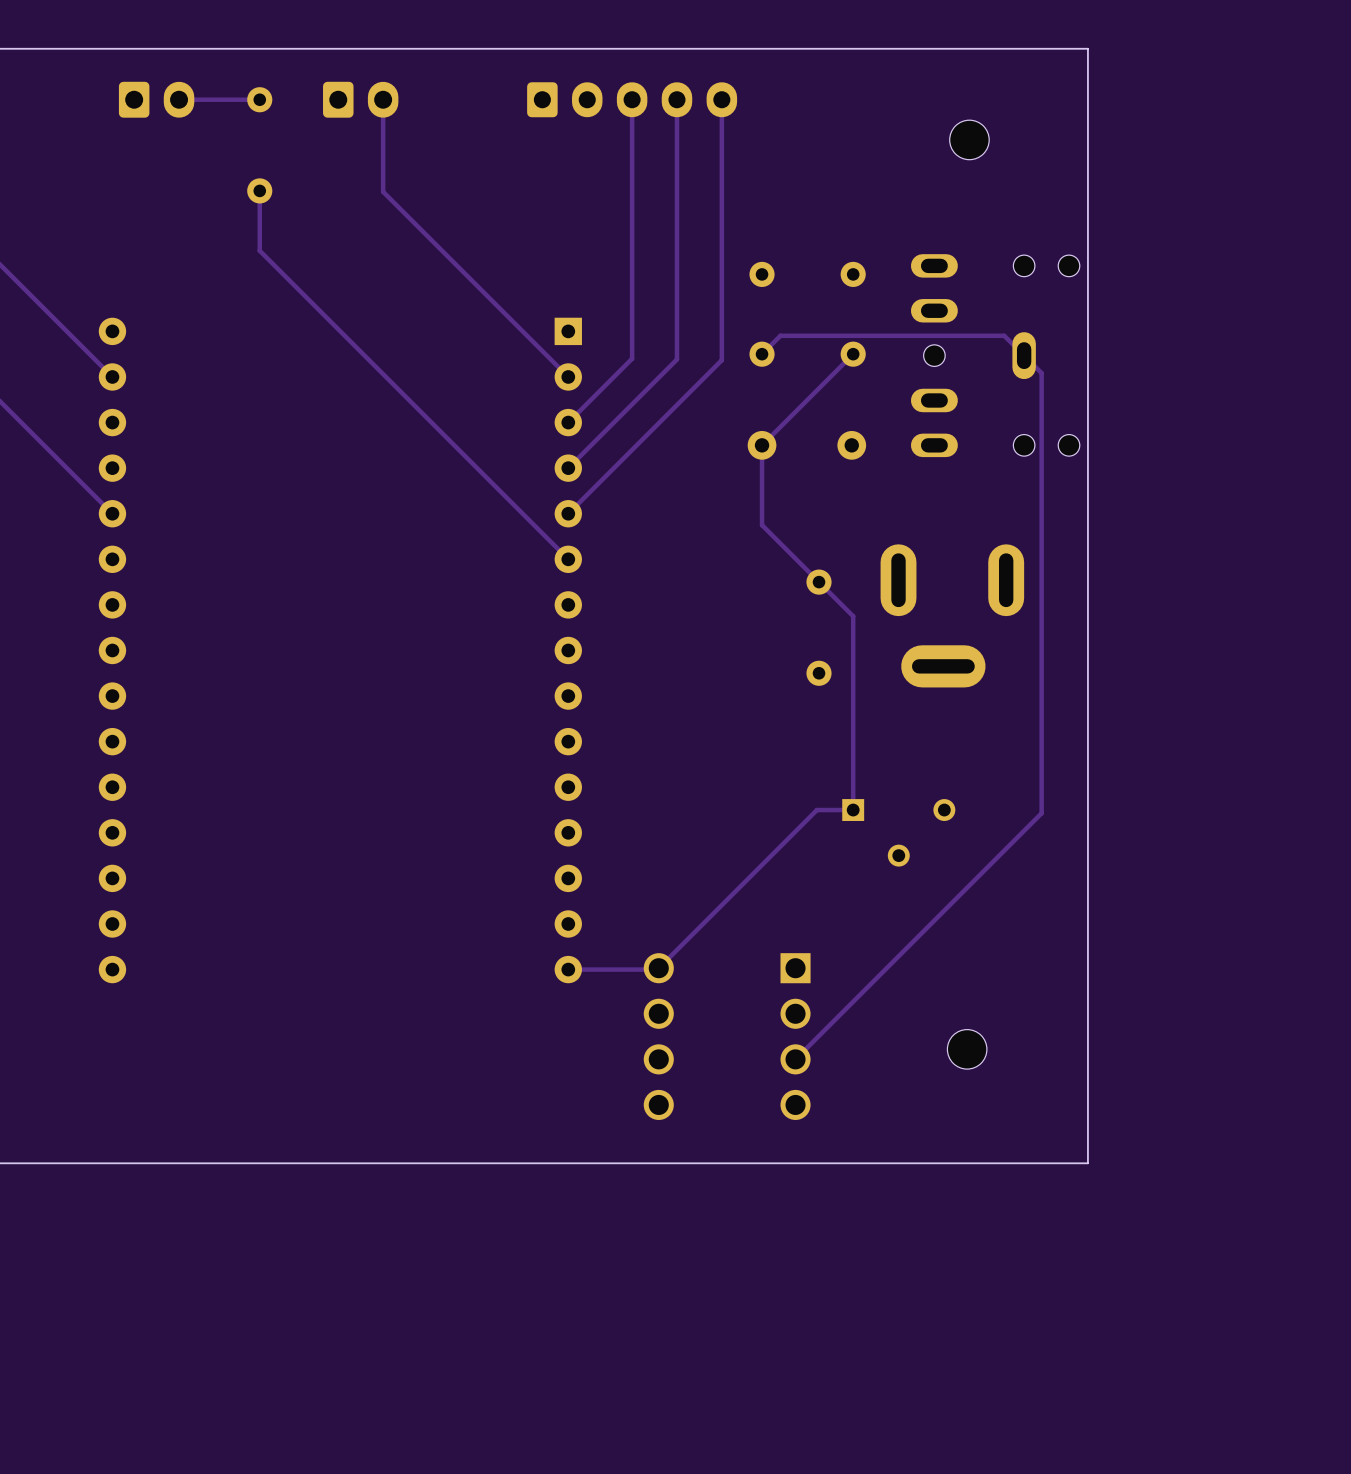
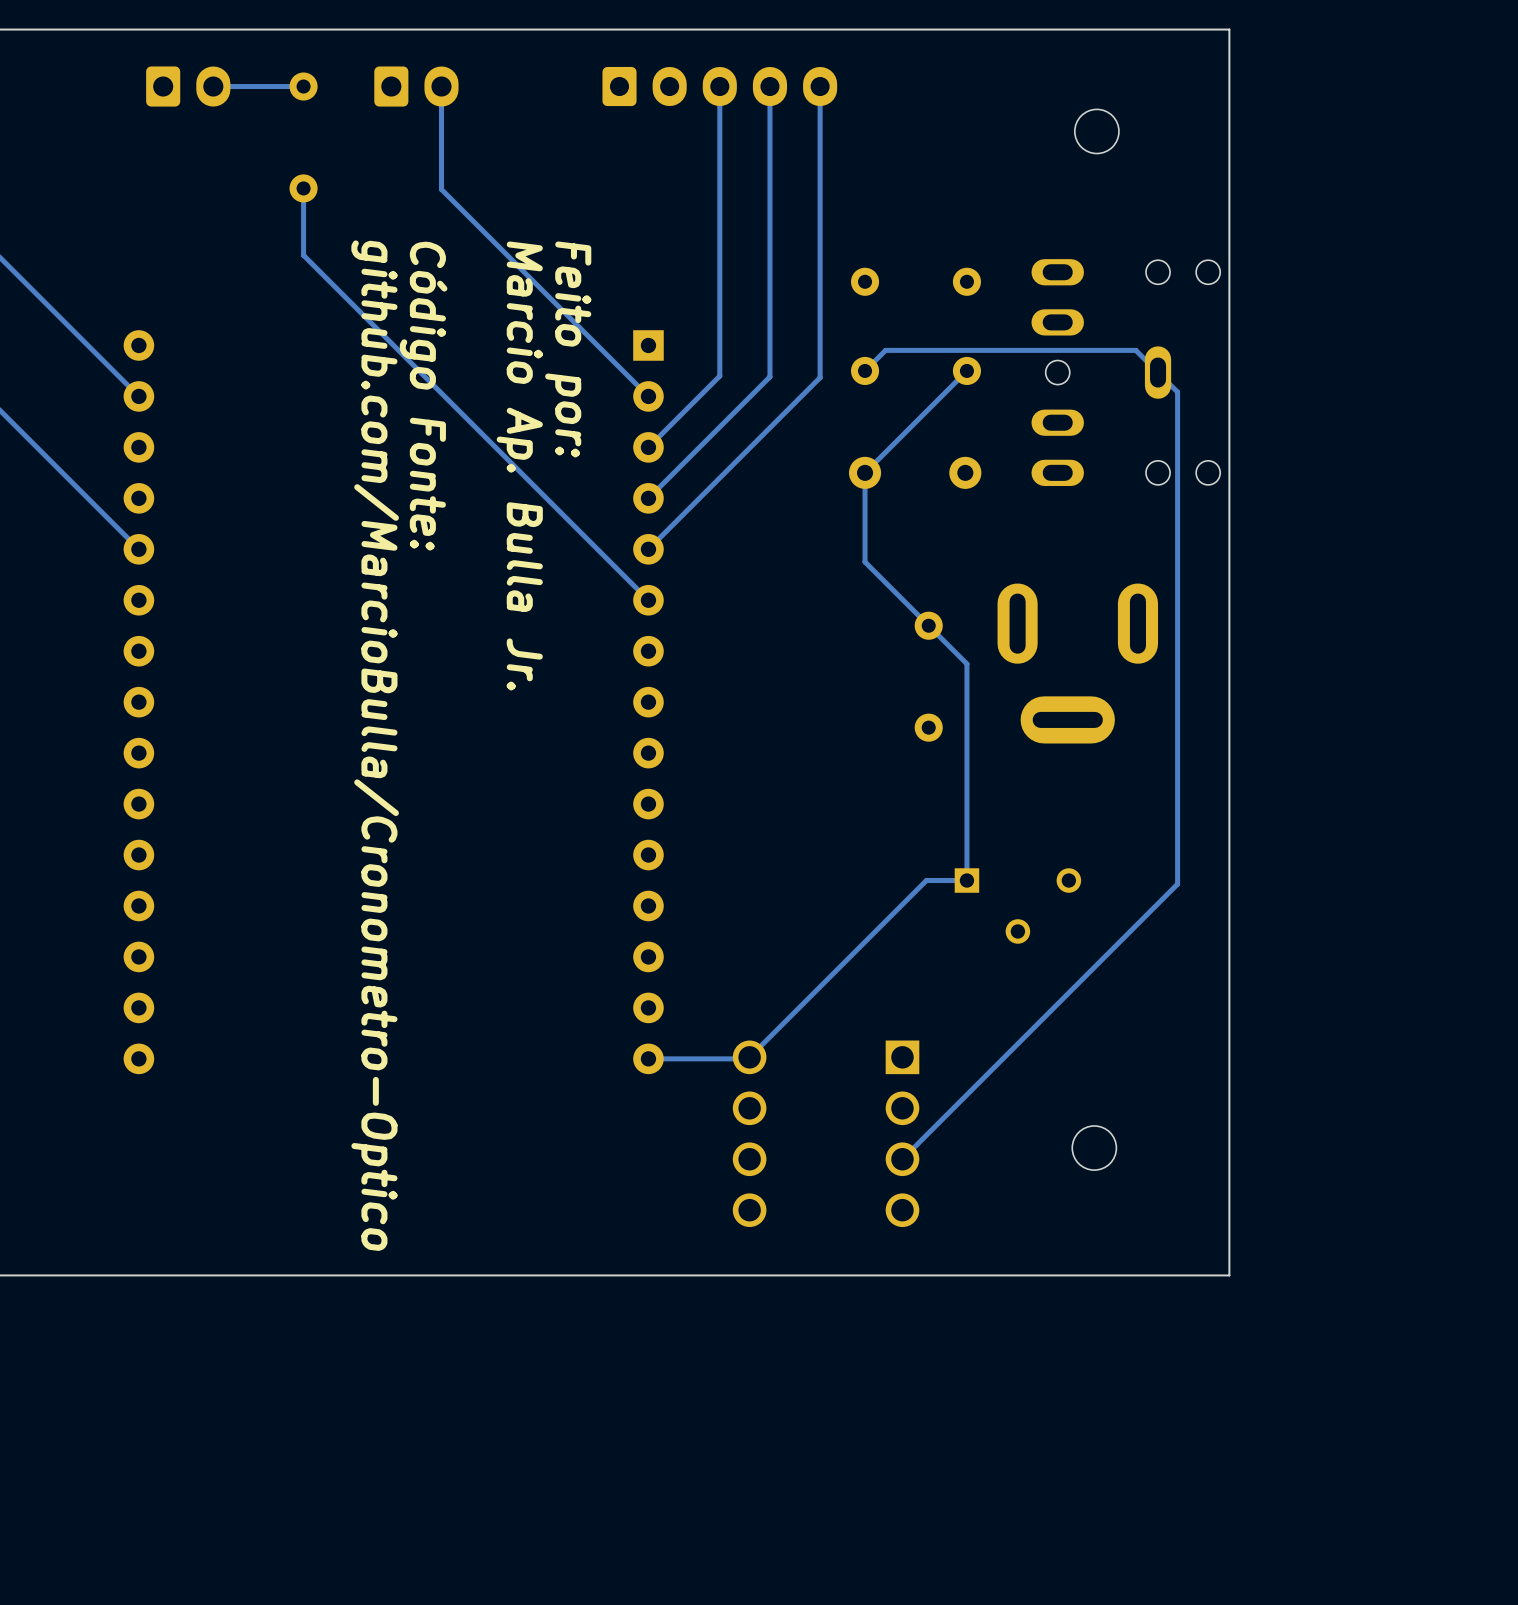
text: none -> Feito por: (568, 349)
text: none -> Código Fonte: (423, 396)
text: none -> Marcio Ap. Bulla Jr. (519, 465)
text: none -> github.com/MarcioBulla/Cronometro-Optico (375, 745)

